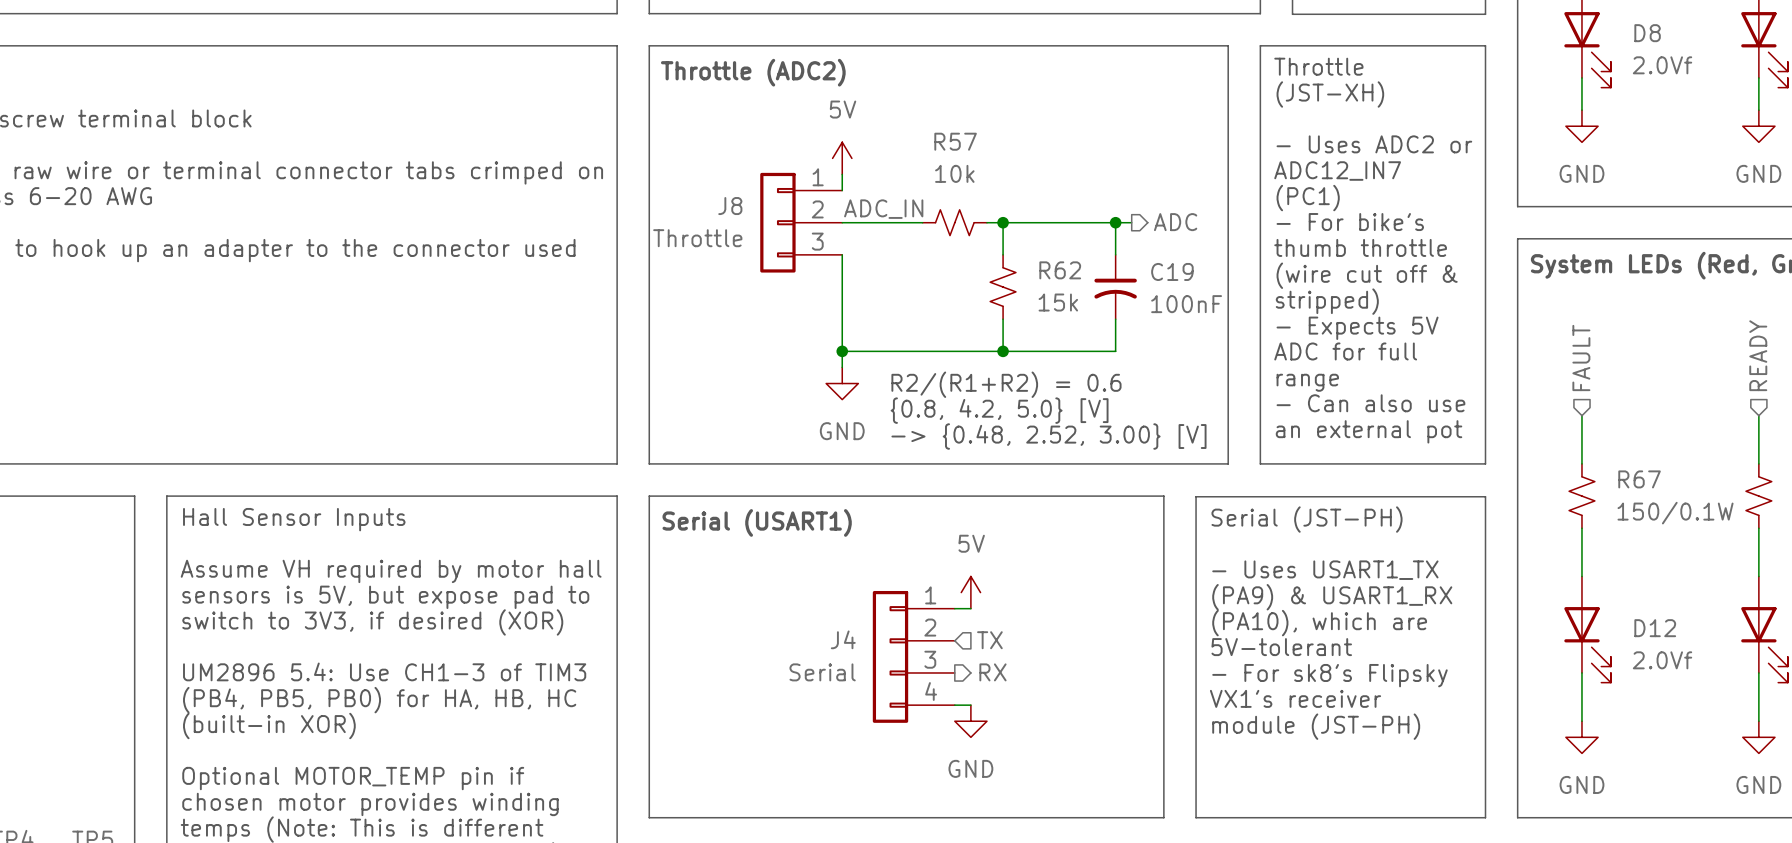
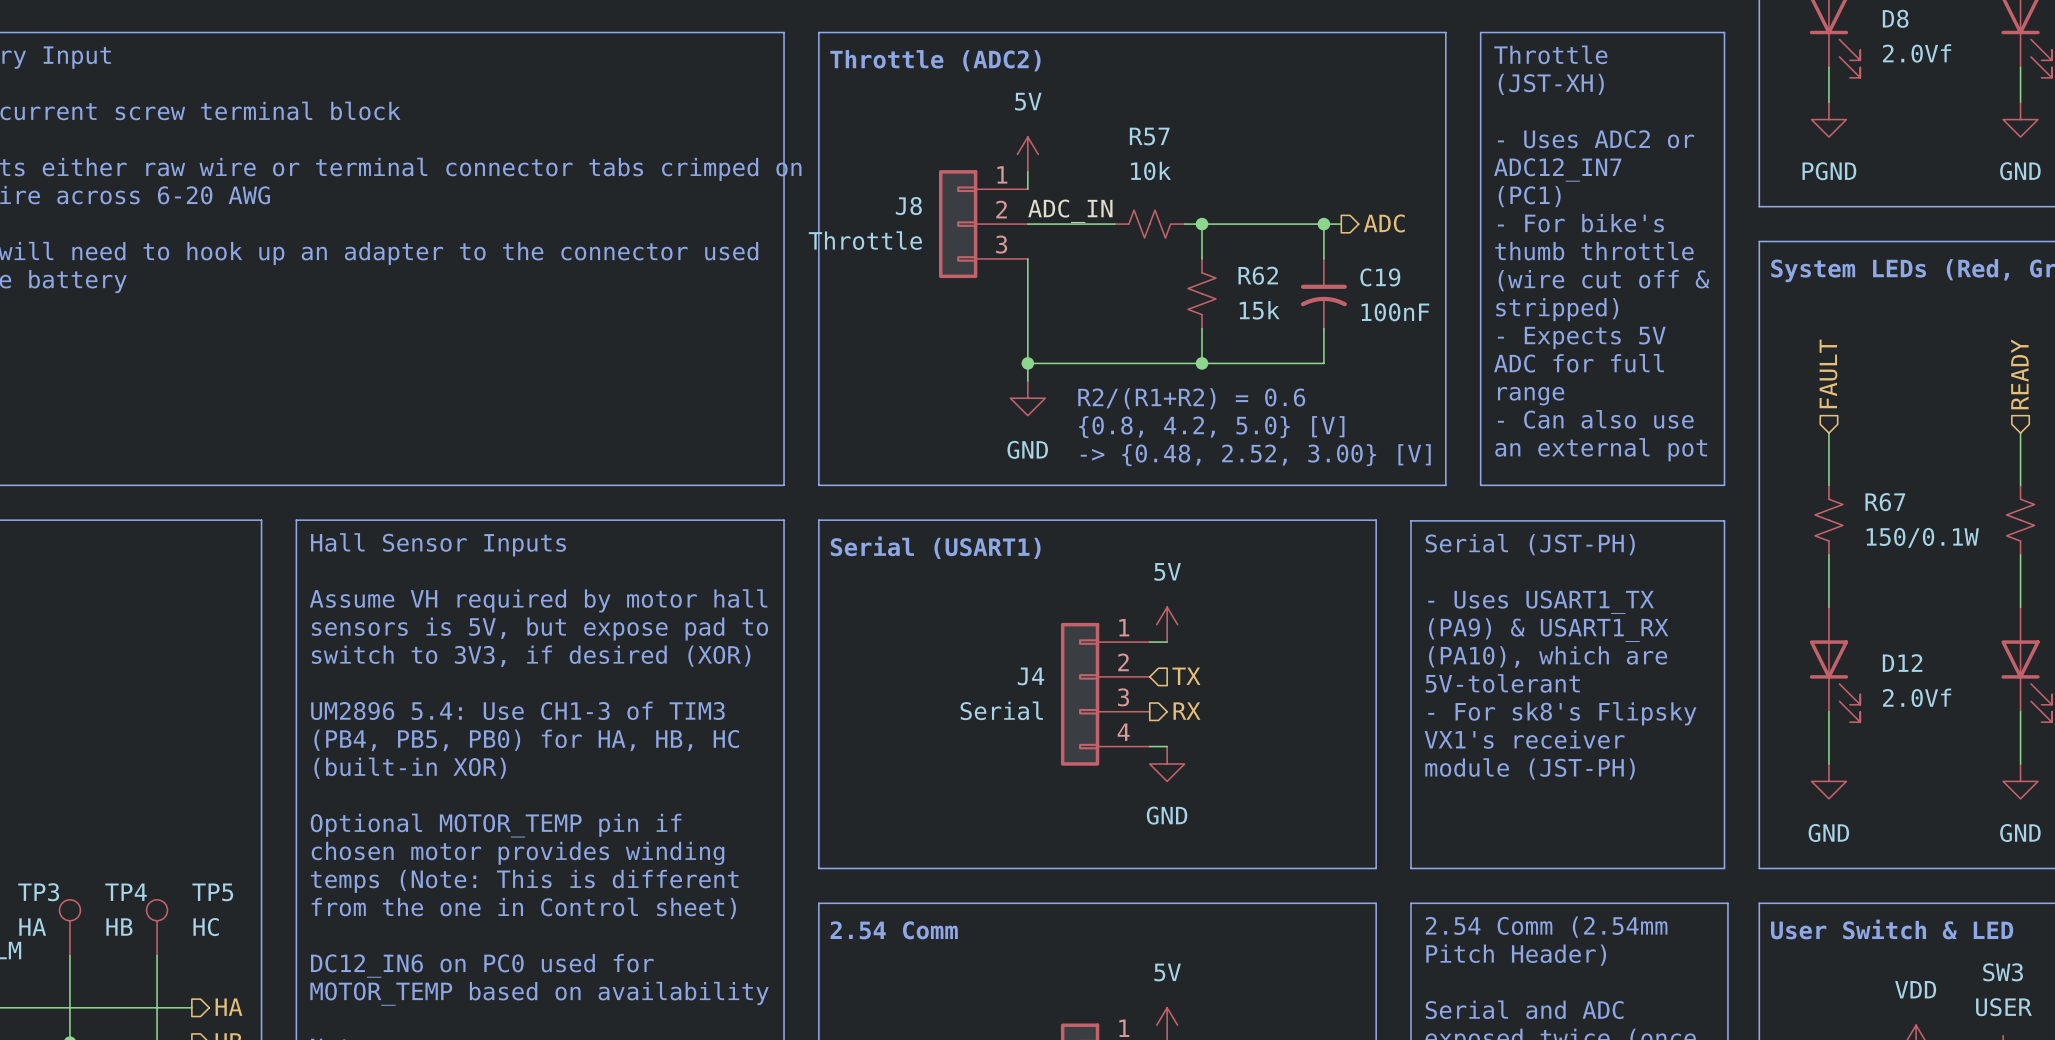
power symbol: GND (1581, 126) -> PGND (1828, 119)

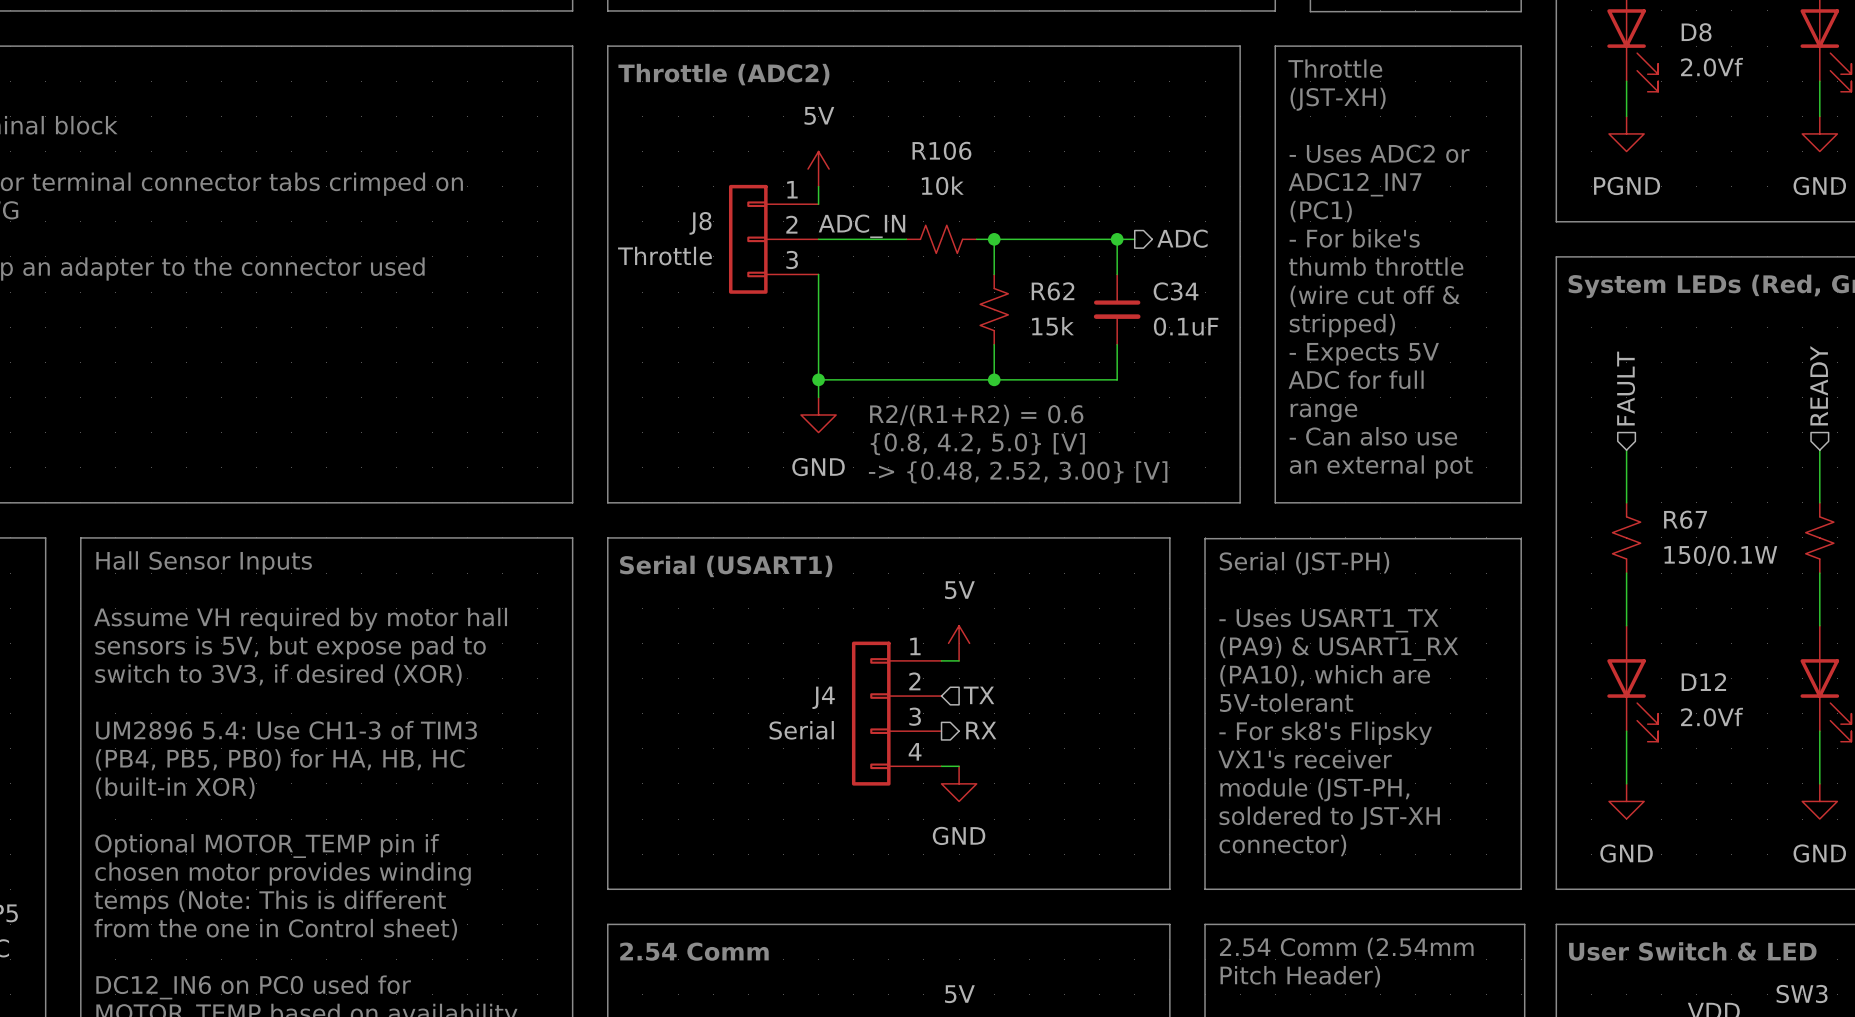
R57 name: R57 (1149, 136) -> R106 (941, 150)
C19: 100nF (1323, 293) -> none
C34: none -> 0.1uF (1117, 309)
text: module (JST-PH) (1530, 768) -> module (JST-PH, (1314, 789)
text: none -> soldered to JST-XH (1329, 818)
text: none -> connector) (1282, 845)

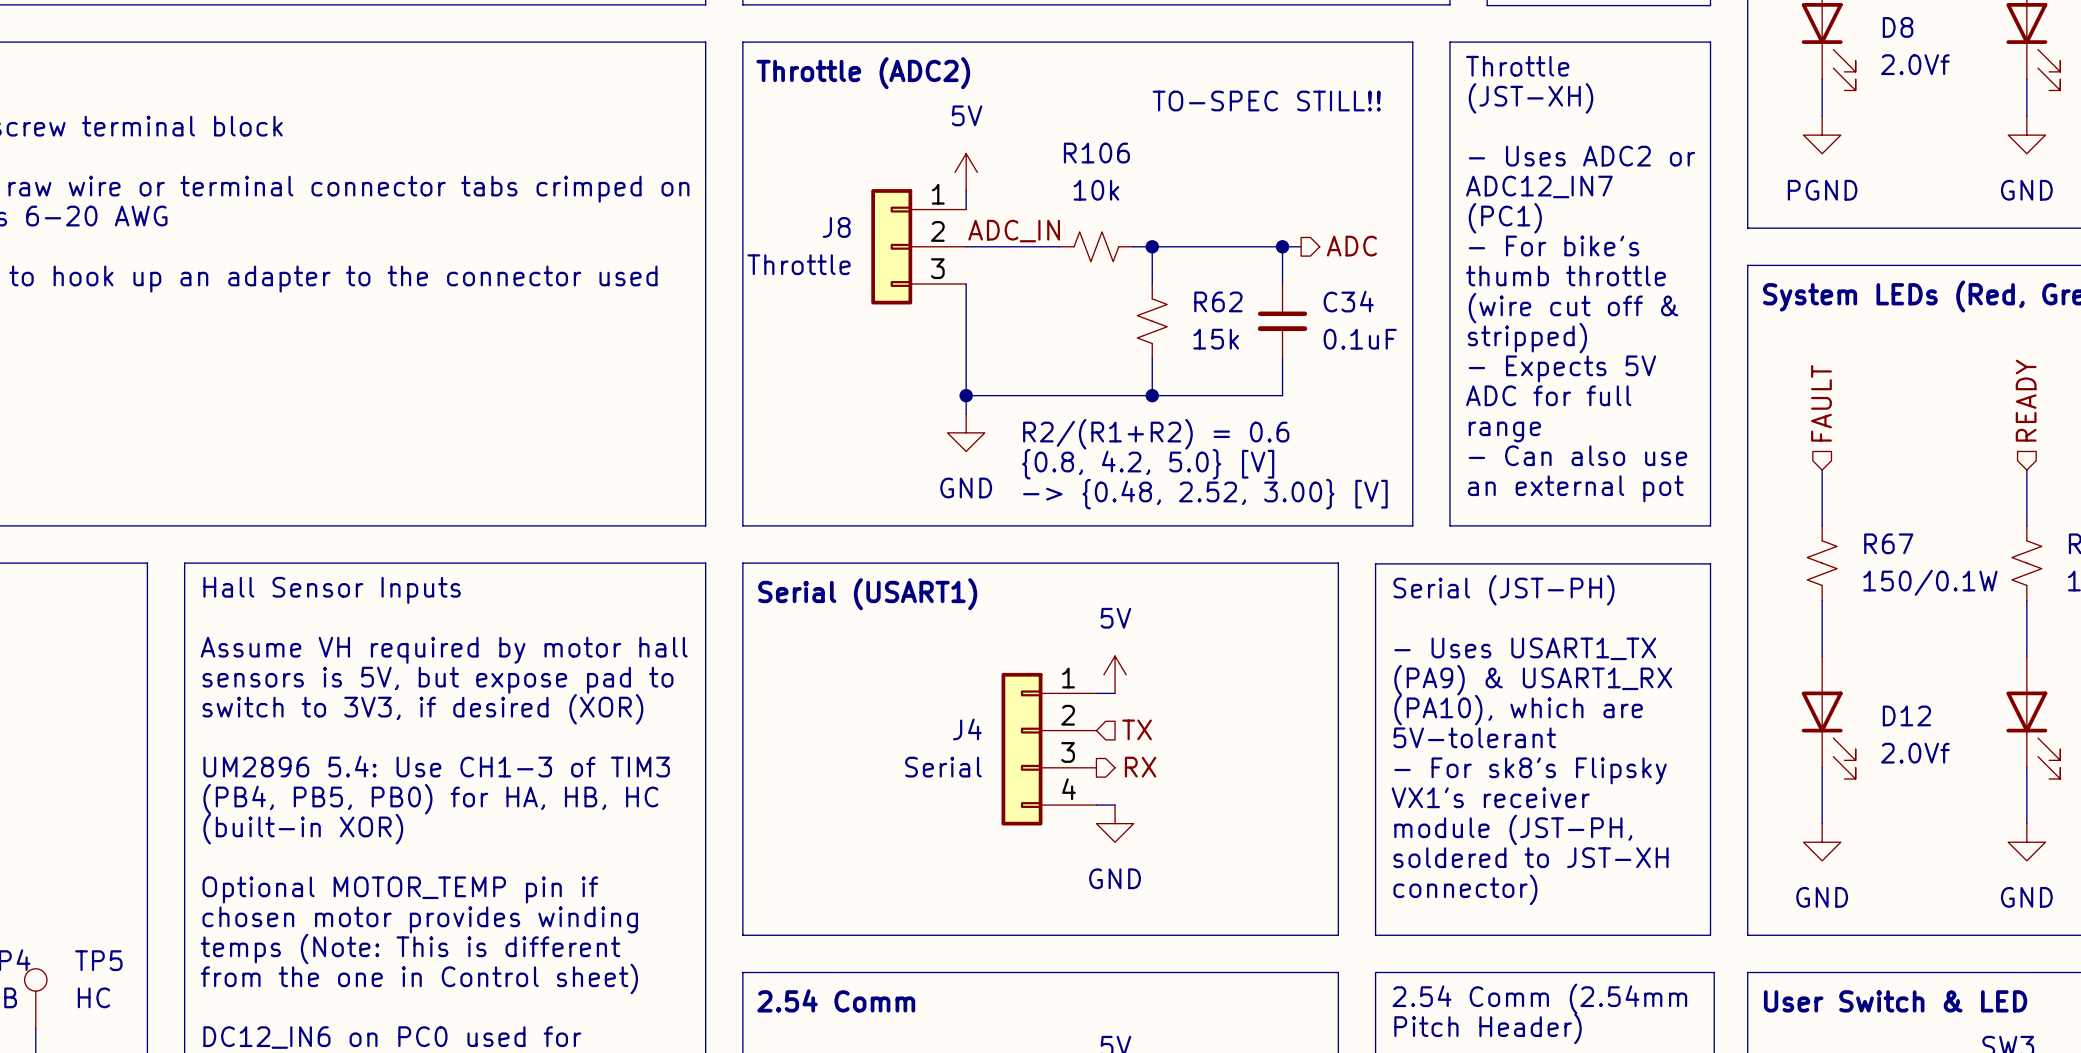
text: none -> TO-SPEC STILL!! (1266, 101)

